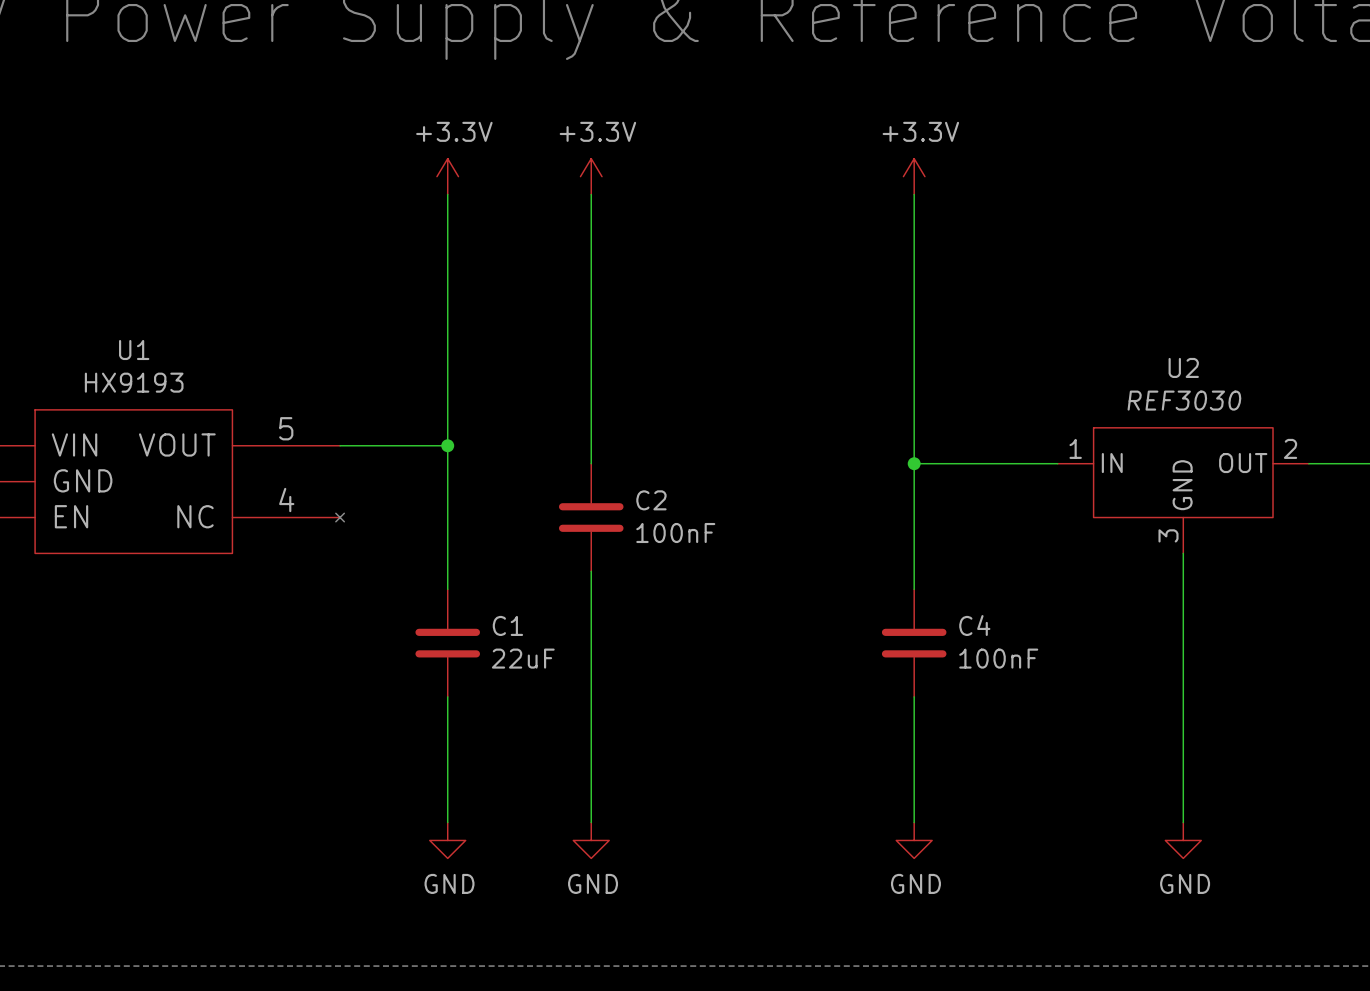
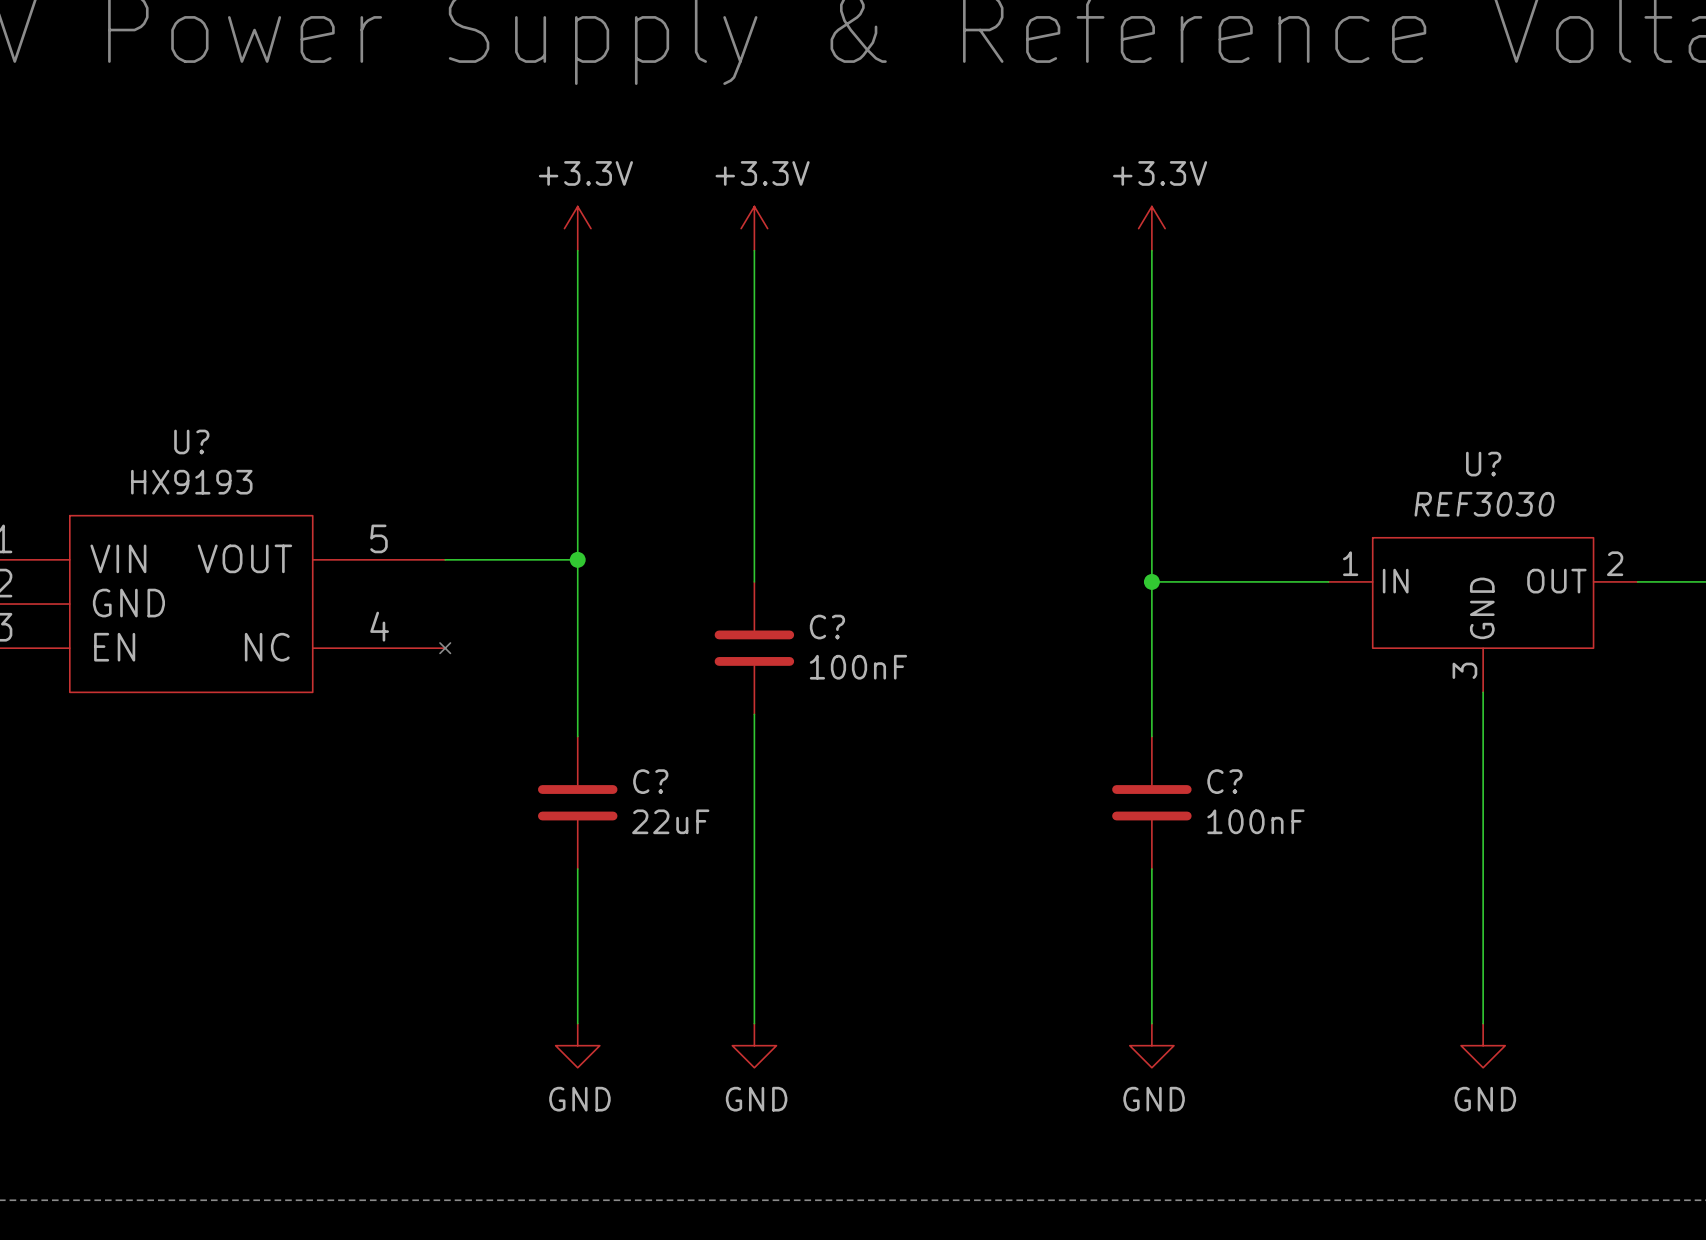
U1 name: U1 (134, 350) -> U? (191, 441)
U2 name: U2 (1183, 367) -> U? (1483, 464)
C2 name: C2 (651, 500) -> C? (827, 627)
C1 name: C1 (507, 625) -> C? (650, 781)
C4 name: C4 (974, 625) -> C? (1224, 781)

